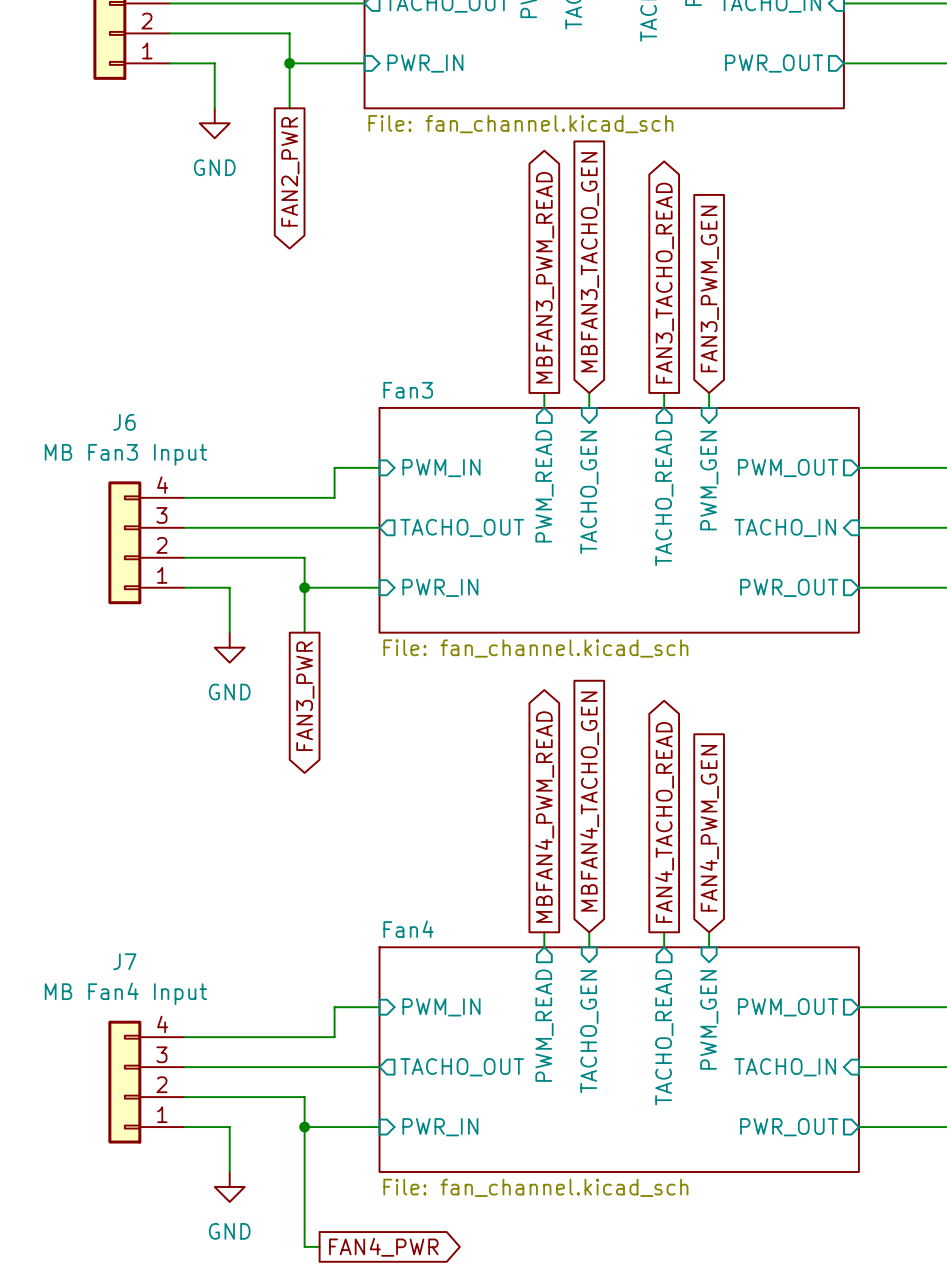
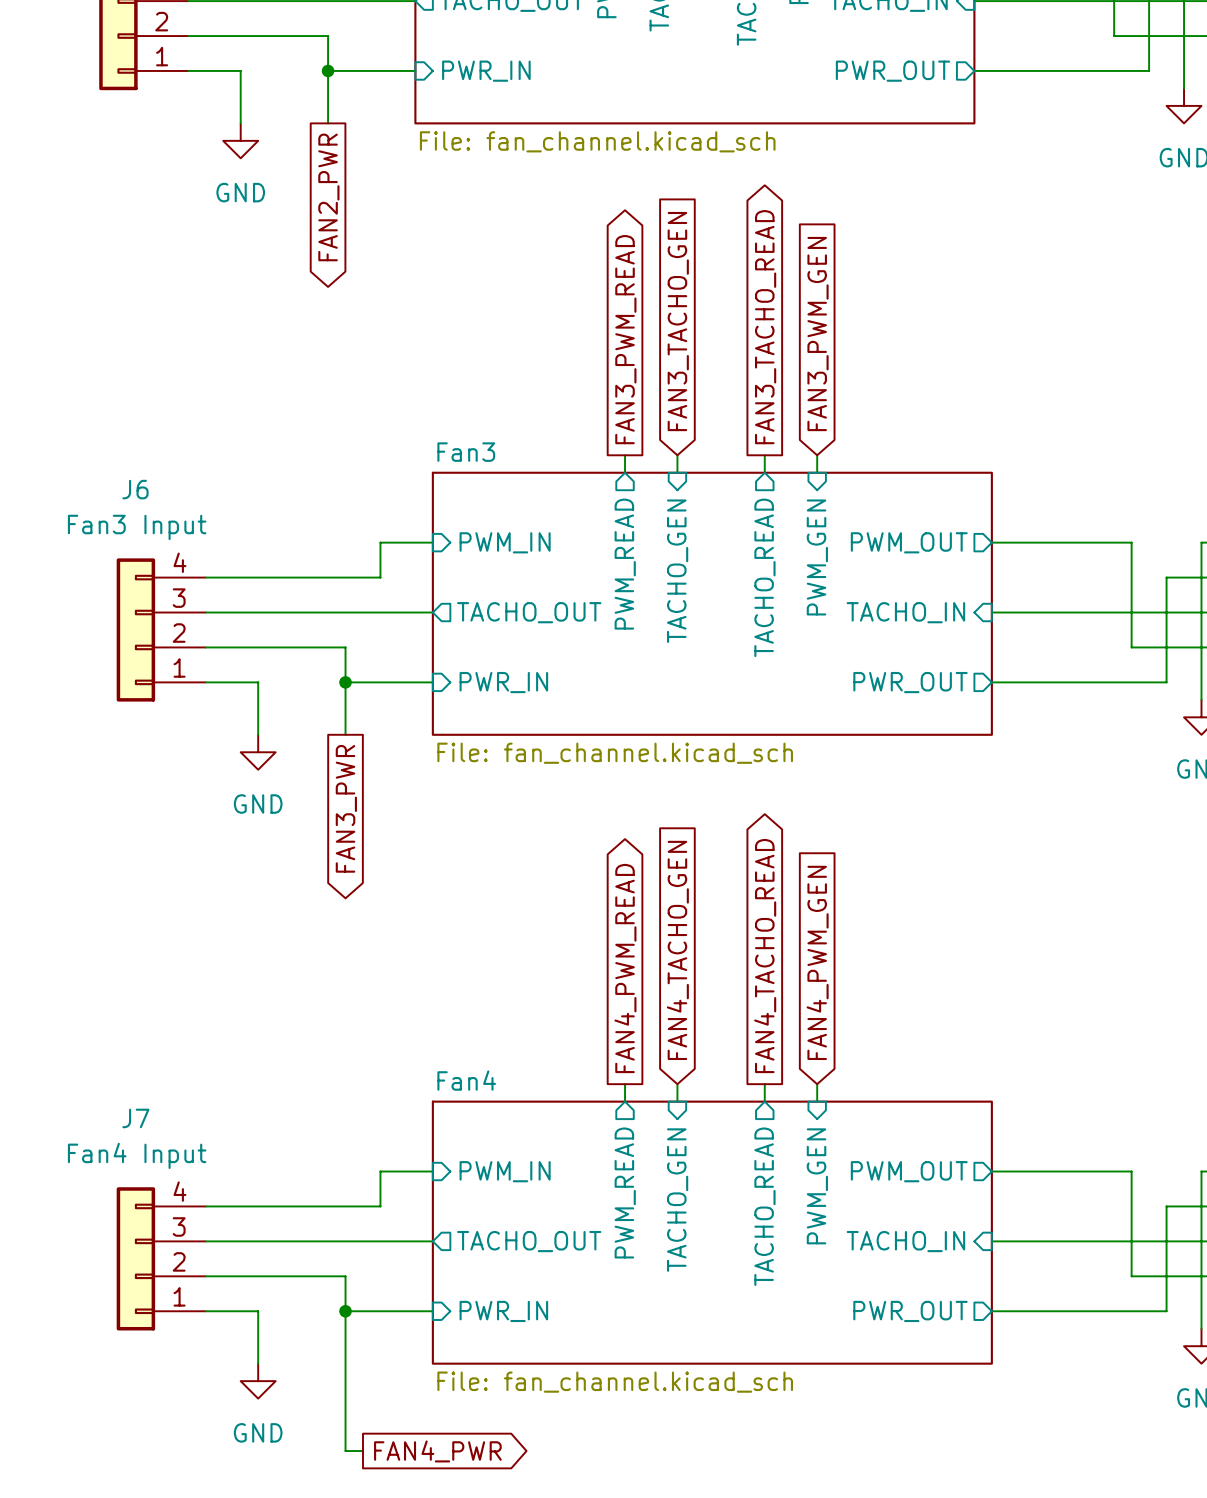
global label: MBFAN3_TACHO_GEN (589, 262) -> FAN3_TACHO_GEN (678, 321)
global label: MBFAN3_PWM_READ (545, 277) -> FAN3_PWM_READ (625, 339)
J6 value: MB Fan3 Input (125, 454) -> Fan3 Input (137, 527)
global label: MBFAN4_TACHO_GEN (589, 801) -> FAN4_TACHO_GEN (677, 950)
global label: MBFAN4_PWM_READ (544, 817) -> FAN4_PWM_READ (625, 968)
J7 value: MB Fan4 Input (125, 993) -> Fan4 Input (137, 1155)

